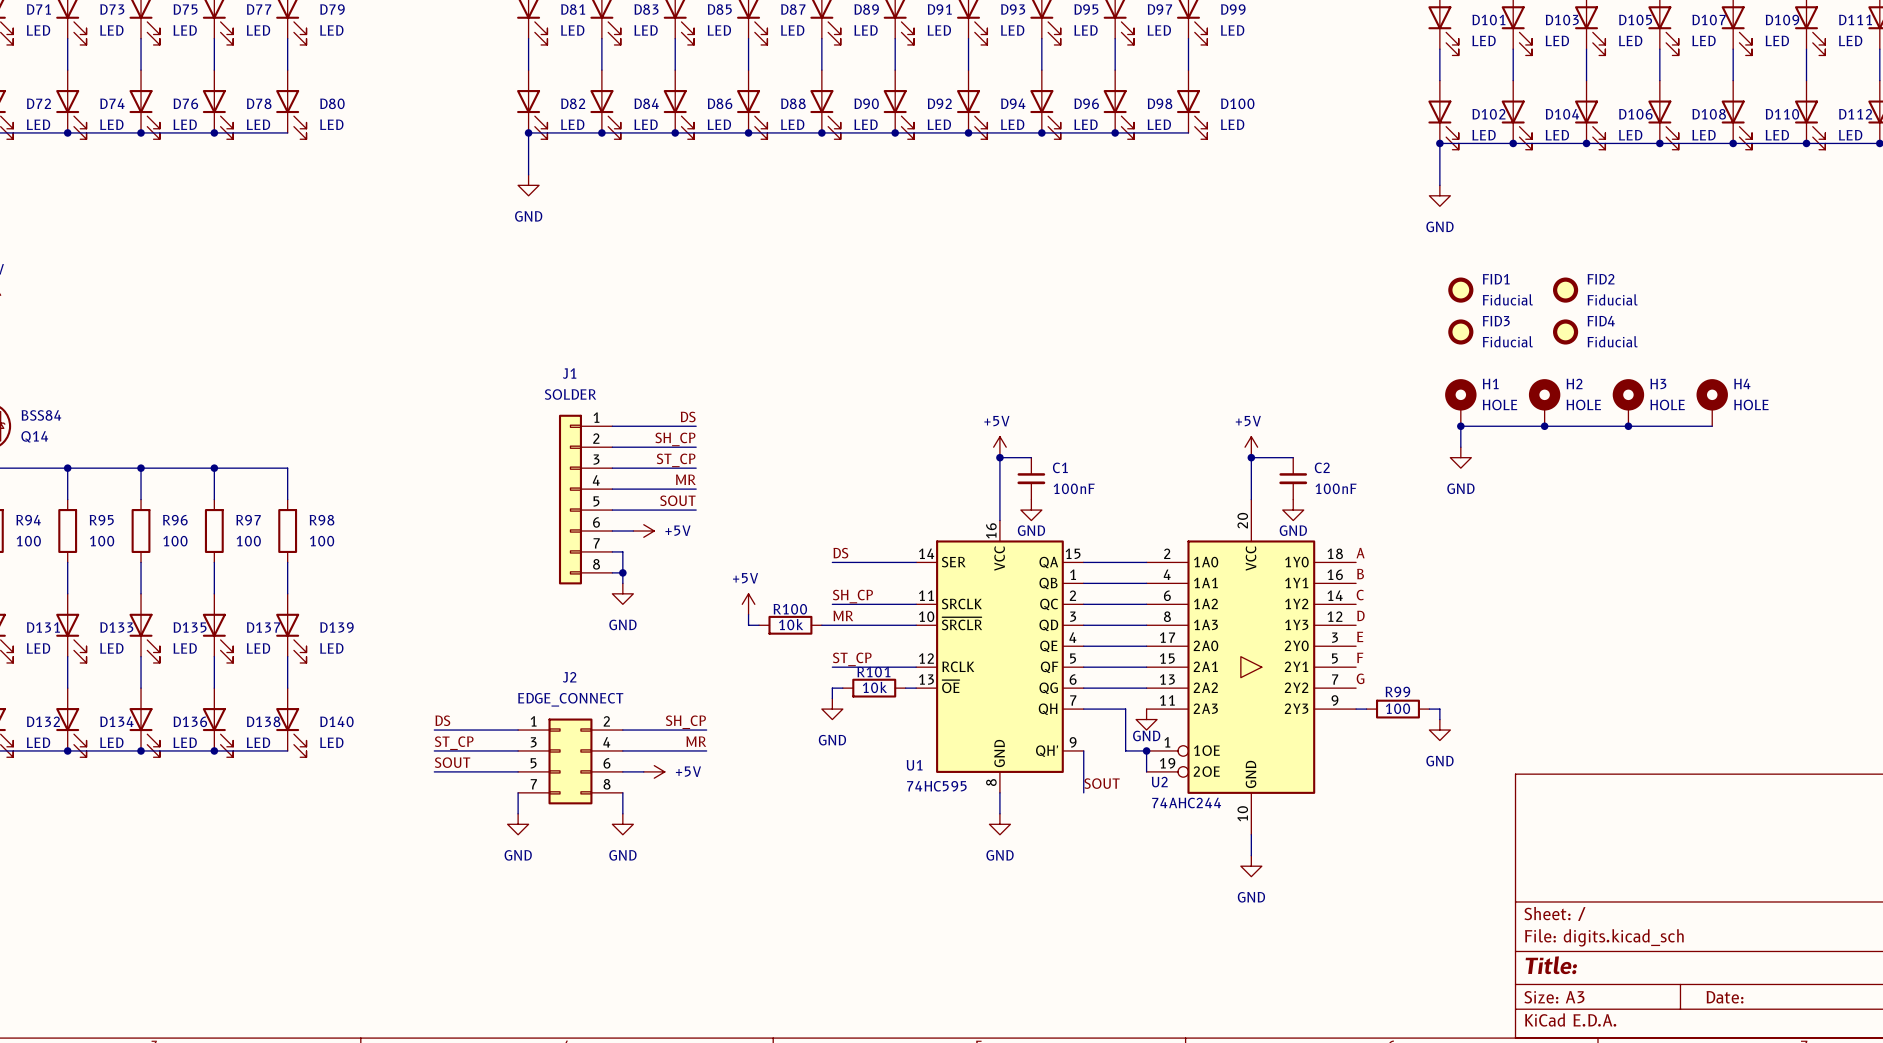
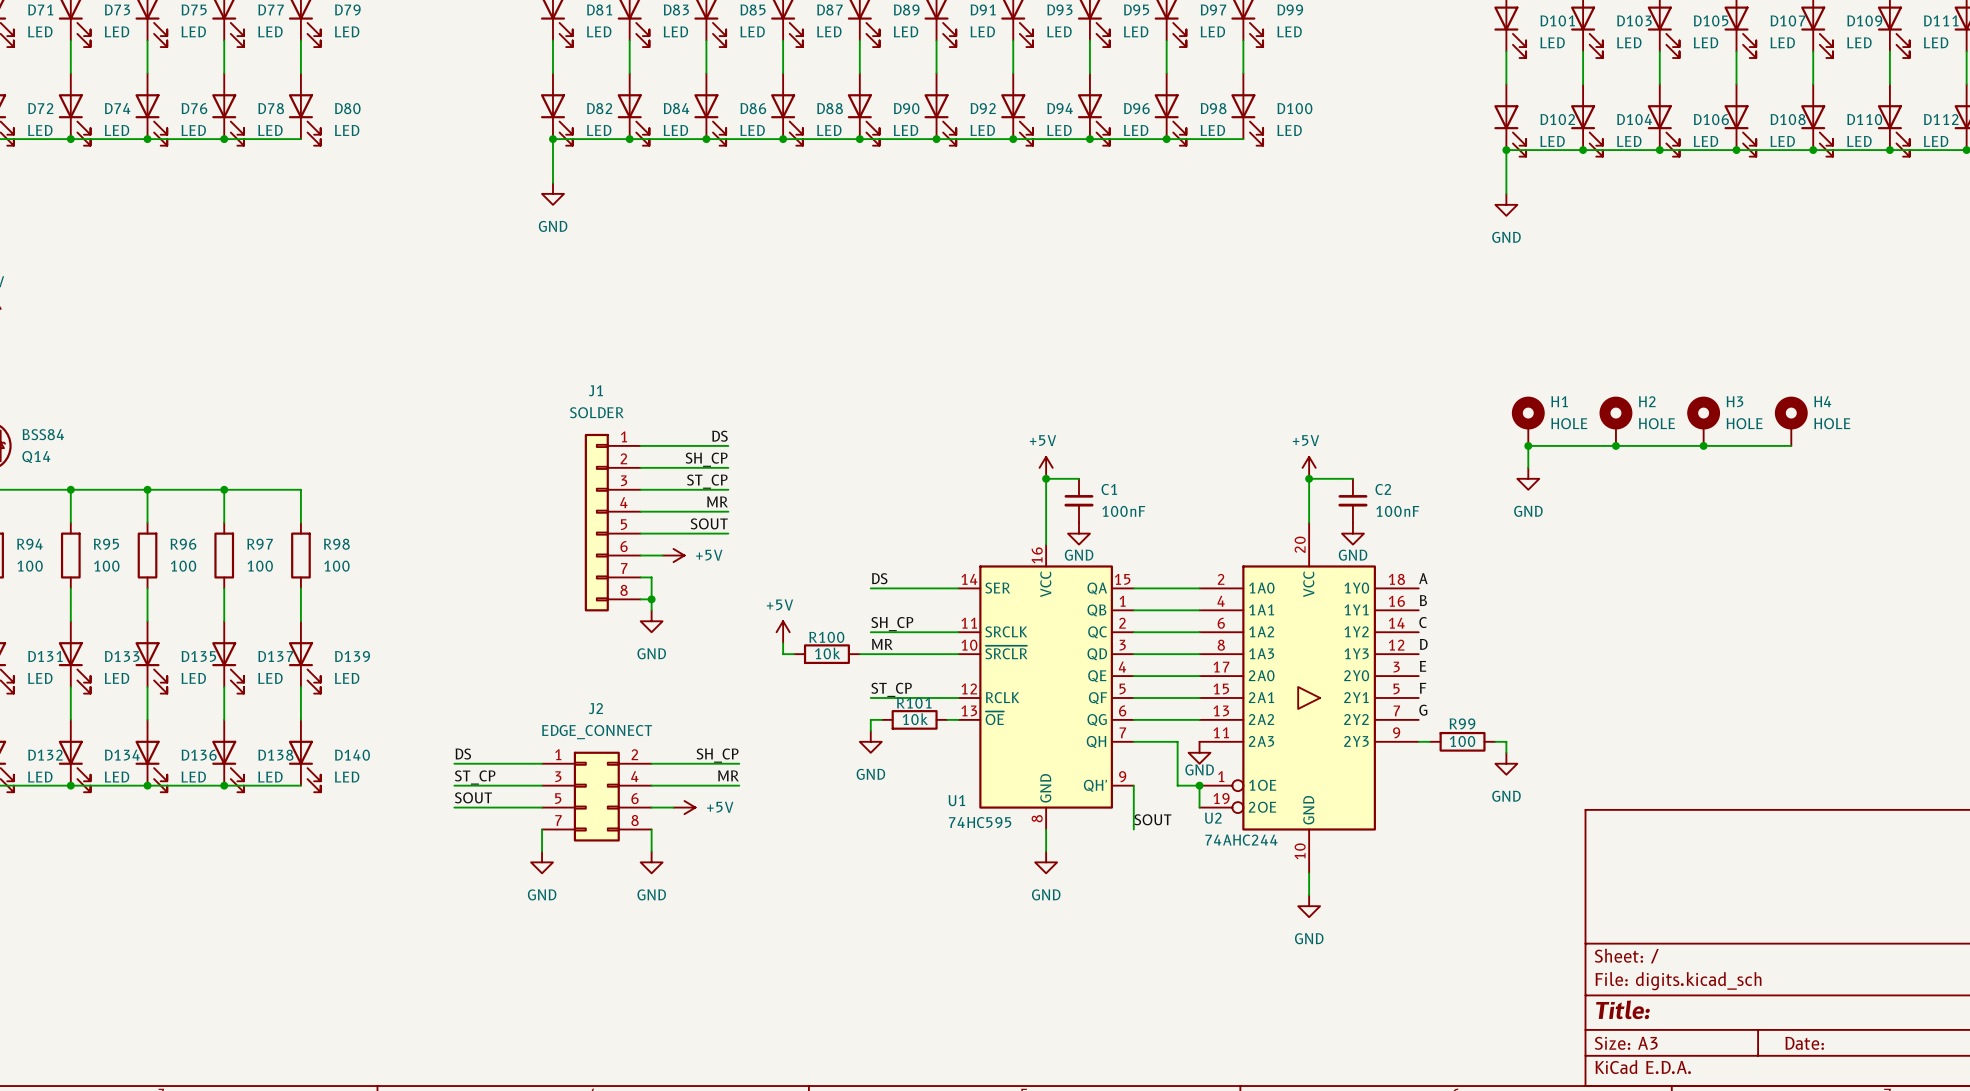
FID1: Fiducial (1460, 290) -> none
FID2: Fiducial (1565, 290) -> none
FID3: Fiducial (1460, 331) -> none
FID4: Fiducial (1565, 331) -> none

